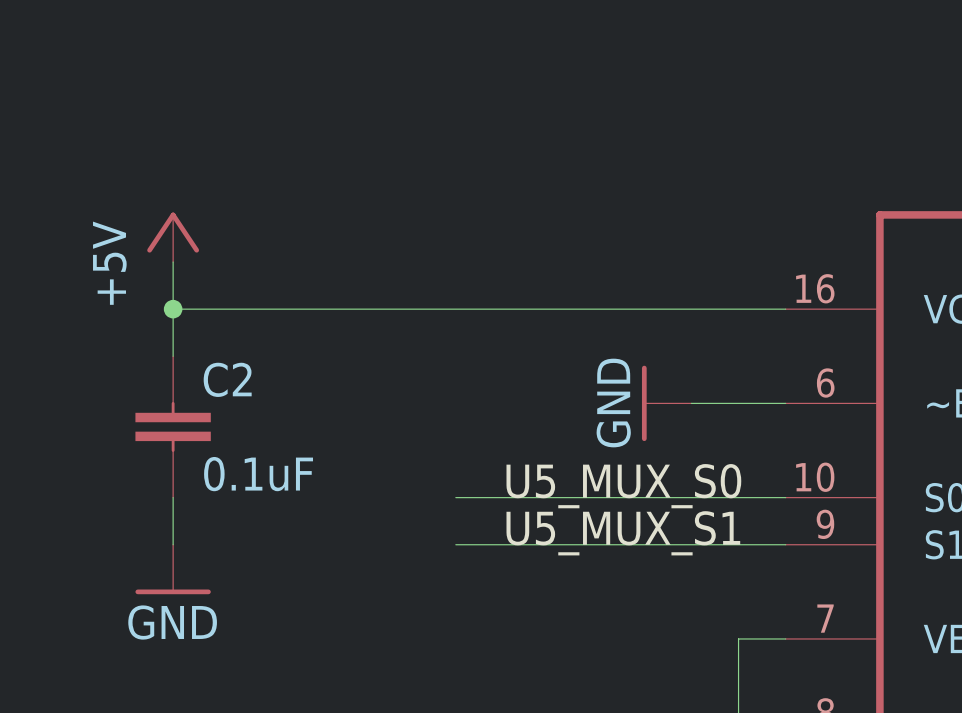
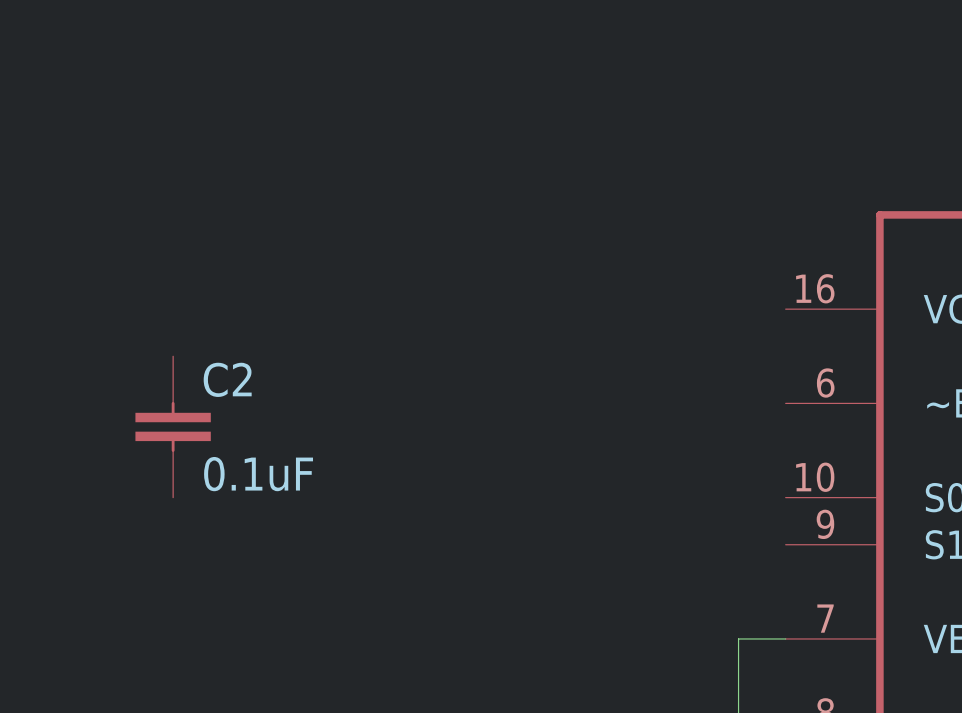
power symbol: +5V (173, 237) -> none
wire: (173, 262) (173, 356) -> none
wire: (173, 309) (785, 309) -> none
junction: (173, 309) -> none
power symbol: GND (666, 403) -> none
wire: (691, 403) (785, 403) -> none
label: U5_MUX_S0 (623, 486) -> none
wire: (173, 497) (173, 544) -> none
wire: (455, 497) (785, 497) -> none
label: U5_MUX_S1 (623, 533) -> none
wire: (455, 544) (785, 544) -> none
power symbol: GND (173, 569) -> none

